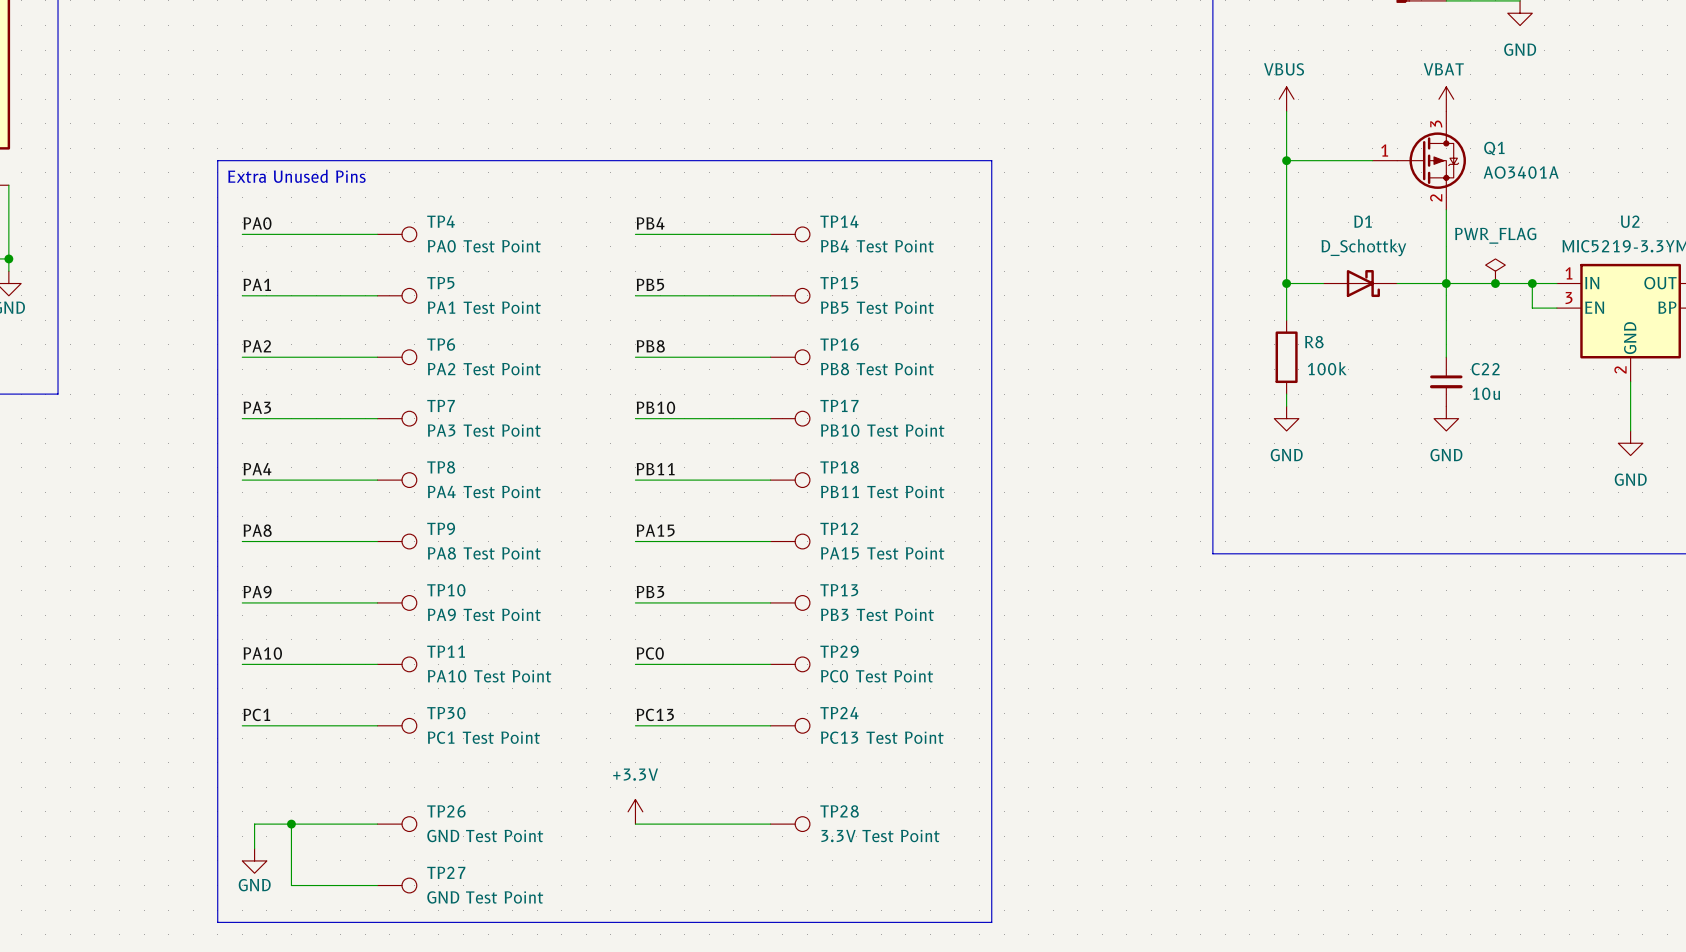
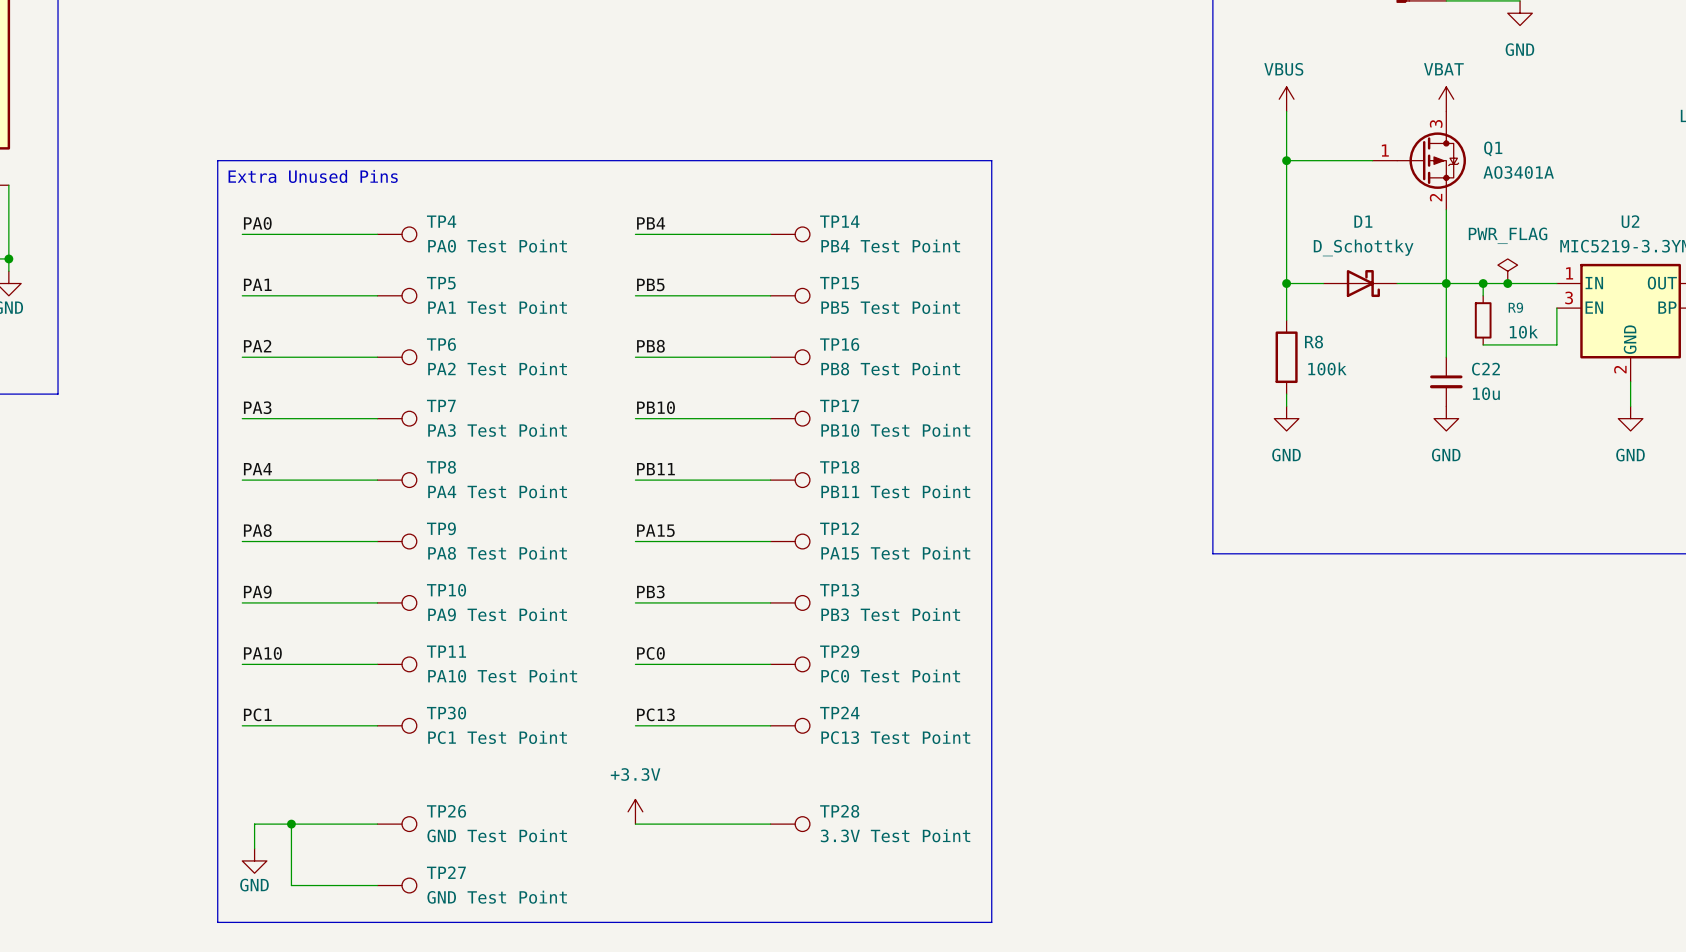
power symbol position: PWR_FLAG (1495, 271) -> PWR_FLAG (1507, 271)
wire: none -> (1483, 283) (1483, 295)
junction: none -> (1483, 283)
junction: (1495, 283) -> none
junction: none -> (1507, 283)
wire: (1532, 283) (1532, 308) (1556, 308) -> (1483, 344) (1556, 344) (1556, 308)
junction: (1532, 283) -> none
R9: none -> 10k (1483, 320)
power symbol position: GND (1630, 443) -> GND (1630, 418)

